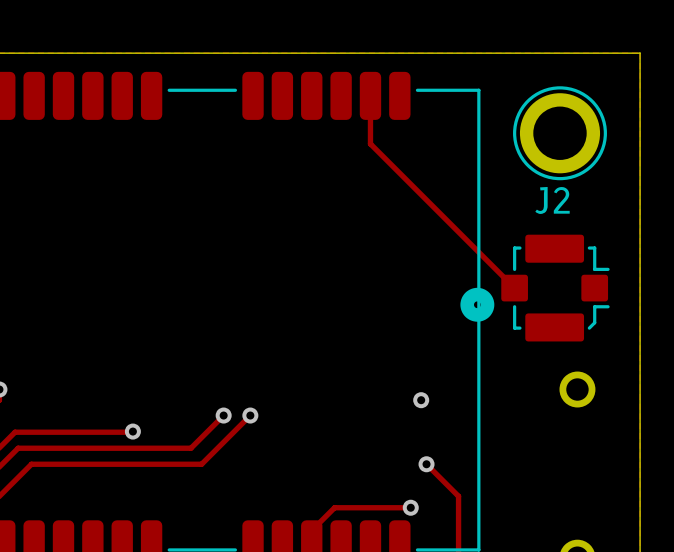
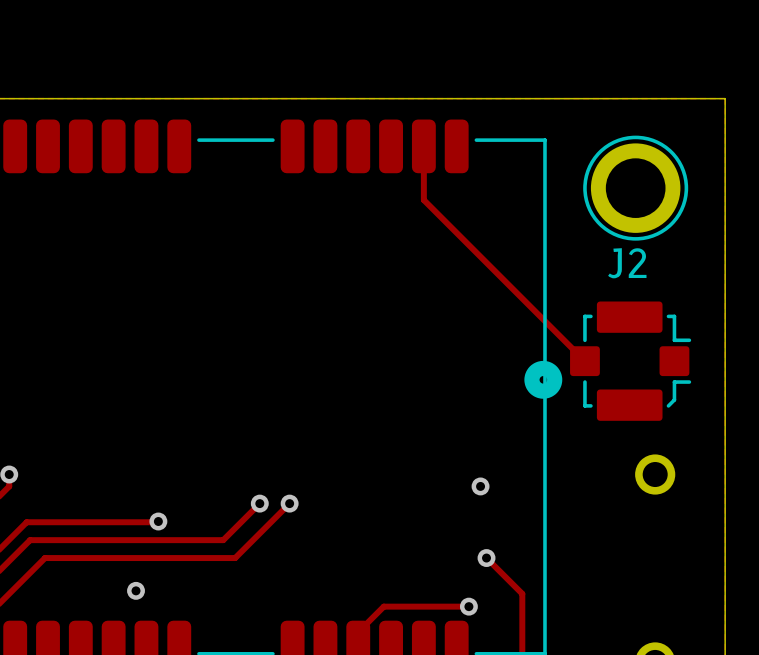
via: none -> (136, 590)

